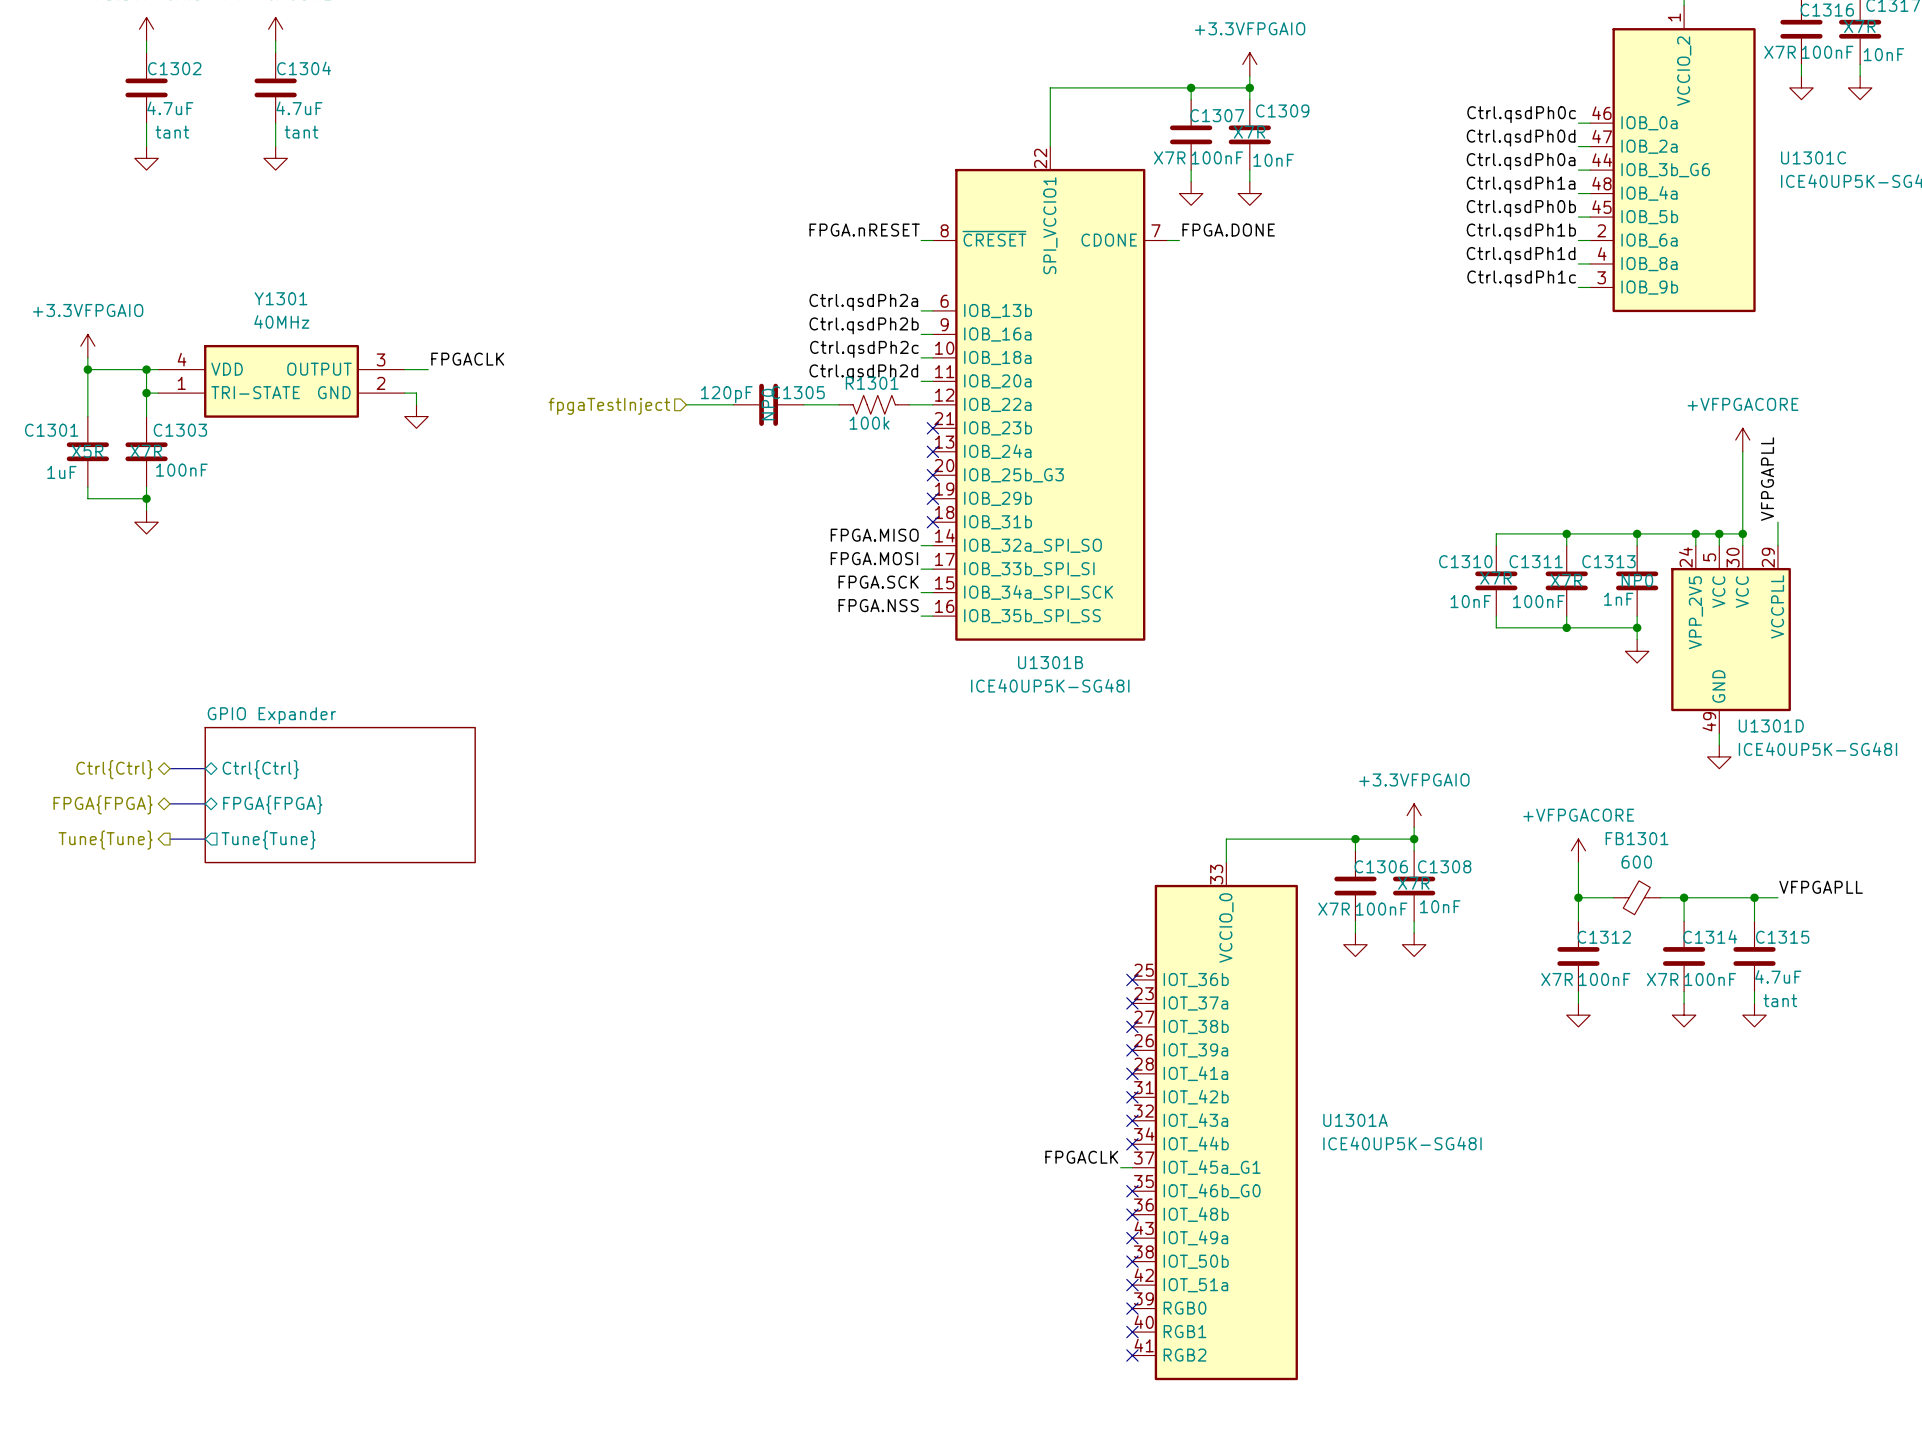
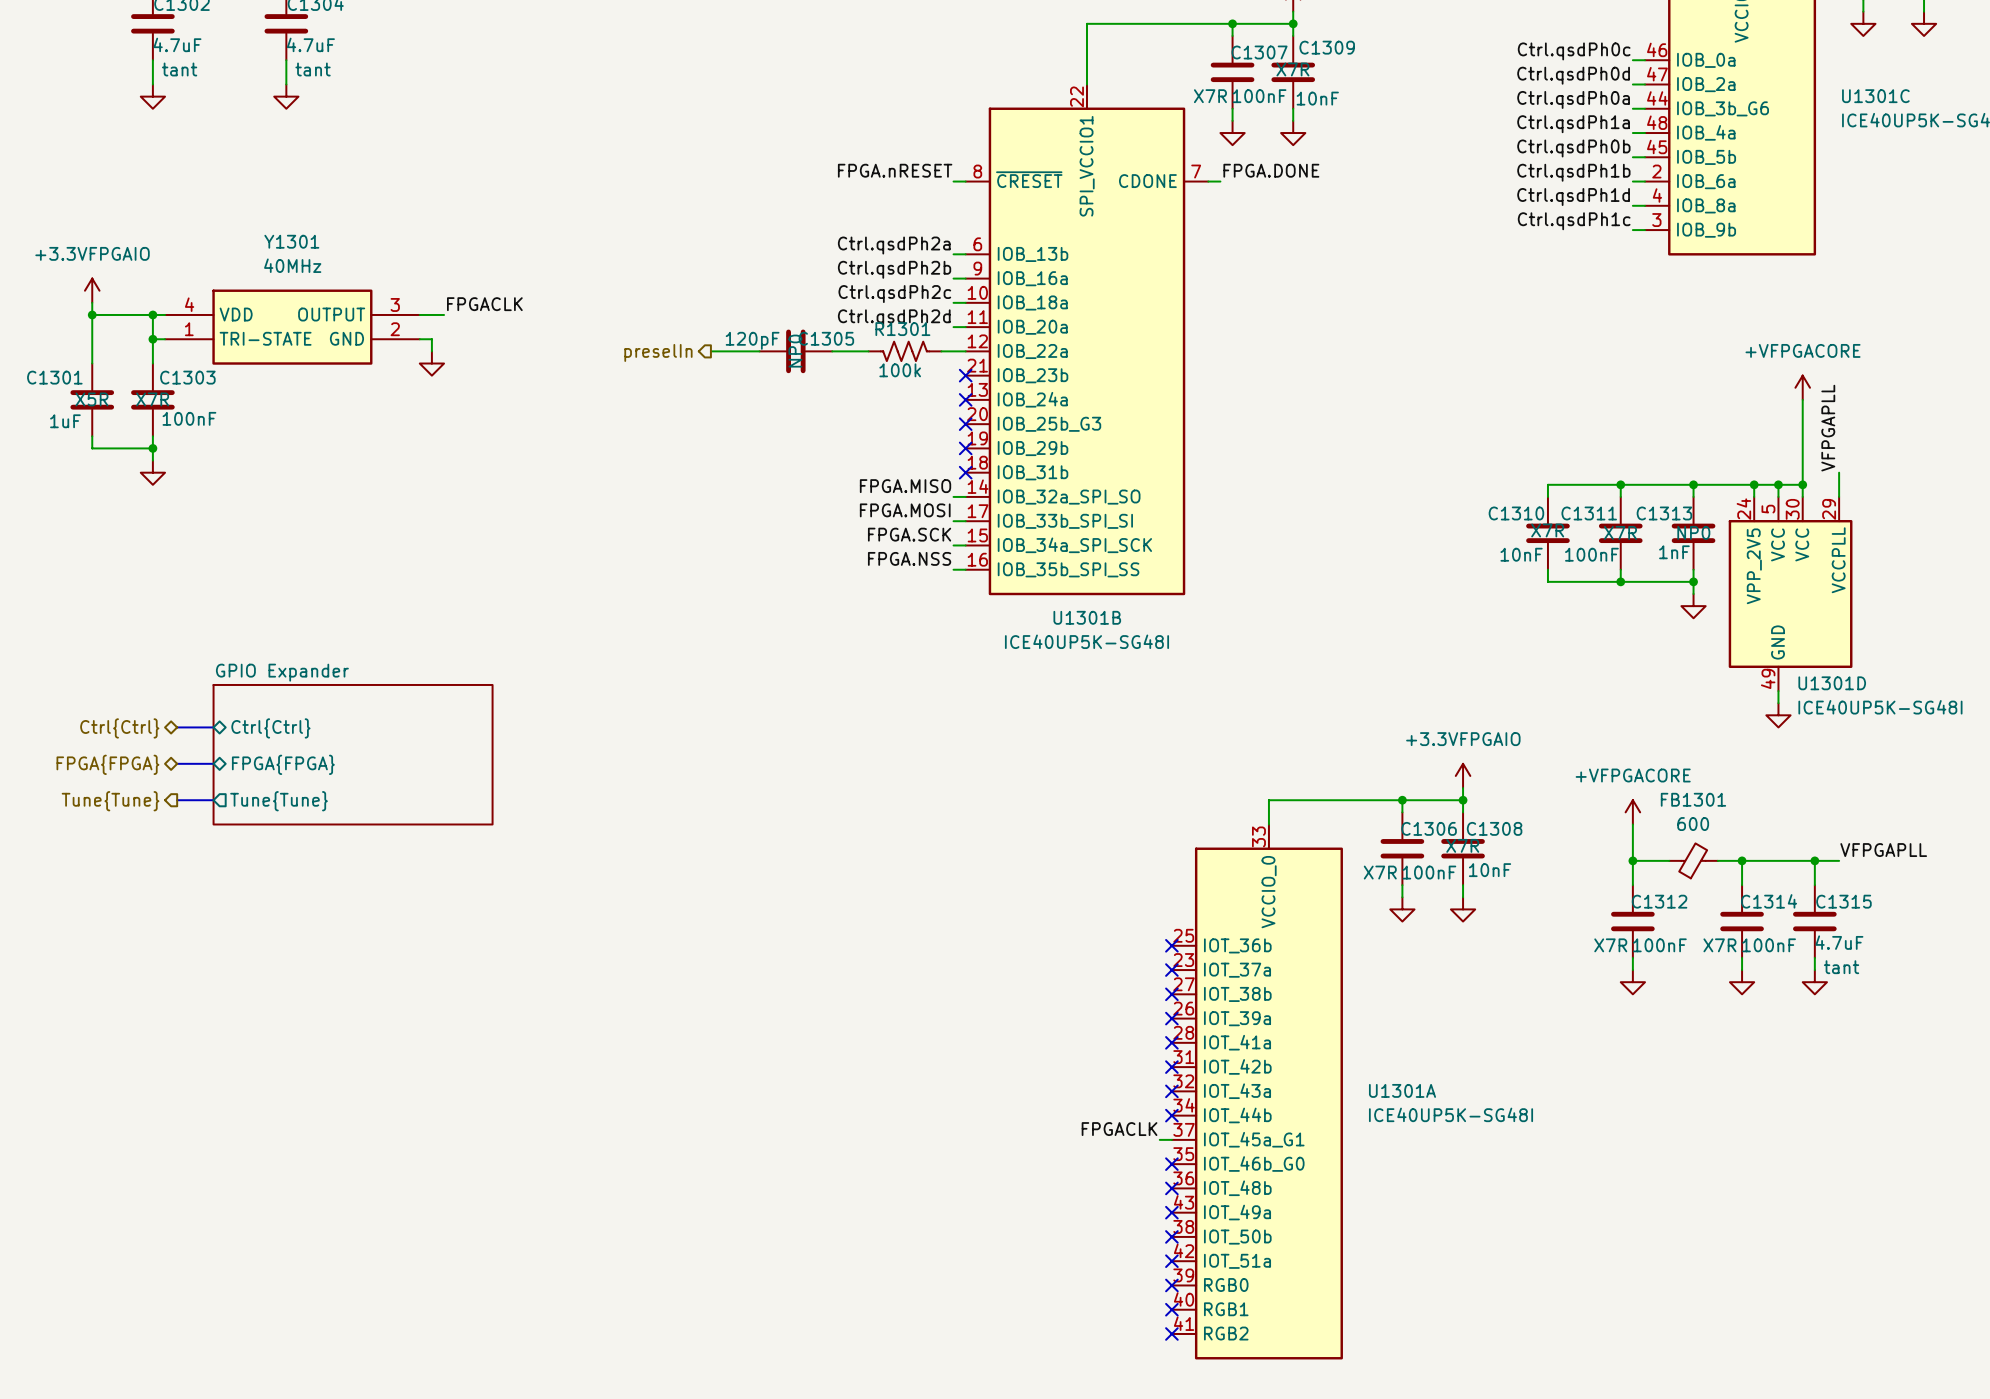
hierarchical label shape: input (609, 406) -> output (658, 352)
hierarchical label: fpgaTestInject (609, 406) -> preselIn (658, 352)

